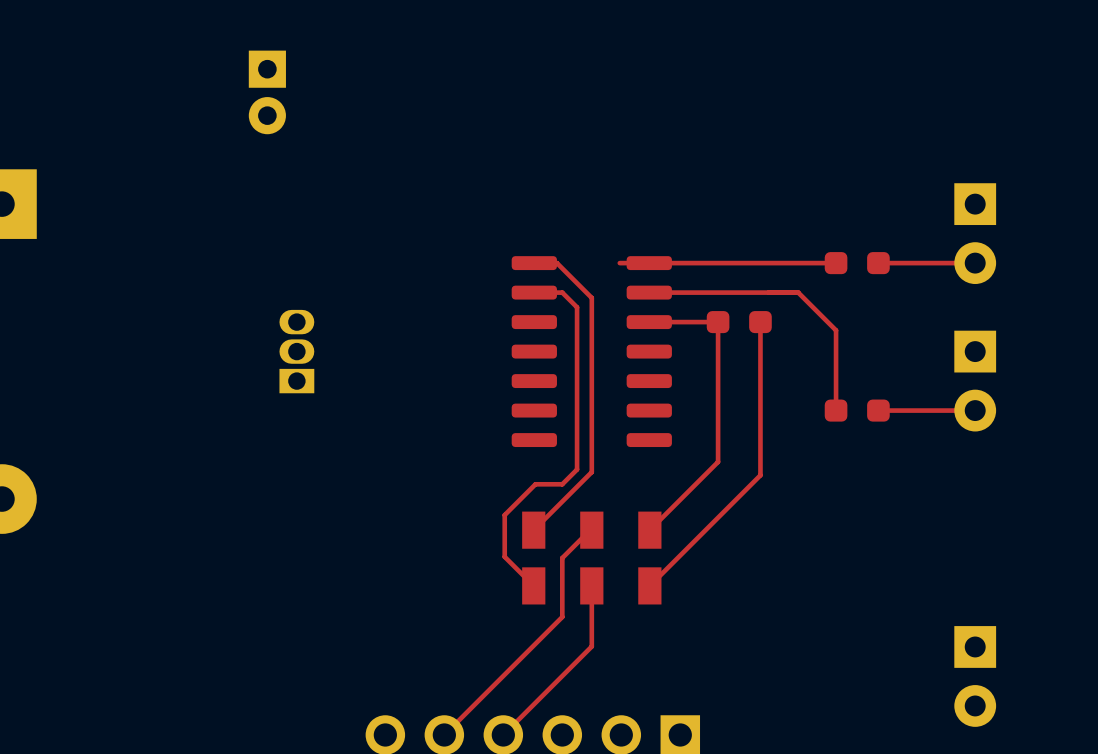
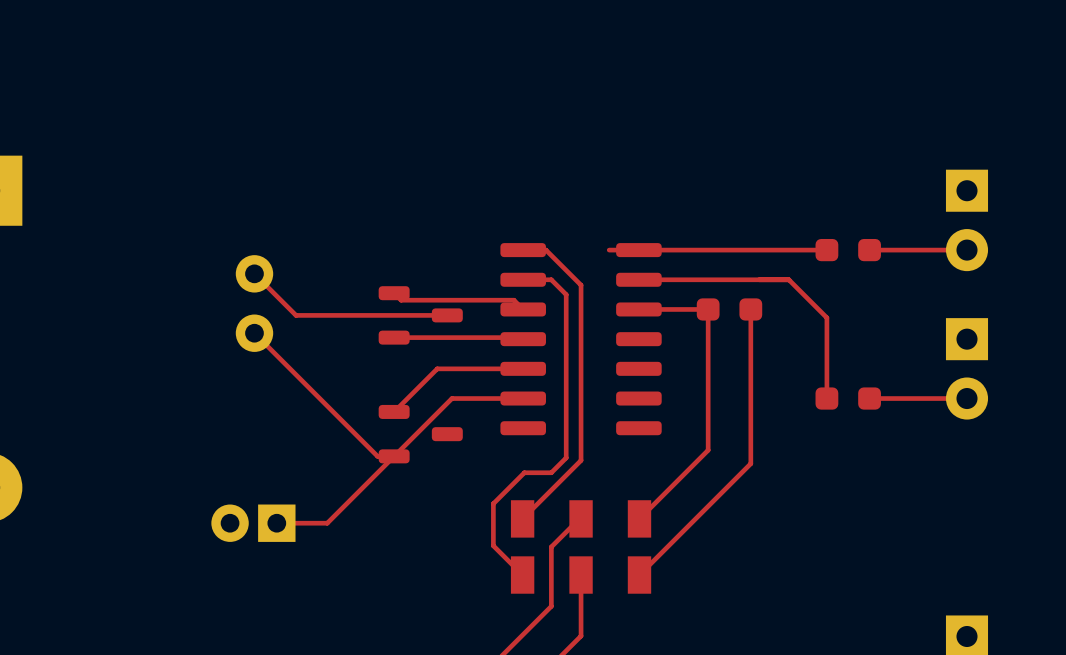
part rotation: 0° (267, 92) -> 90° clockwise (253, 523)
part position: (267, 92) -> (253, 523)
top track: none -> (254, 273) (296, 315) (447, 315)
top track: none -> (394, 293) (401, 300) (513, 300) (523, 309)
part: none -> (254, 303)
part: none -> (420, 315)
top track: none -> (254, 333) (377, 456) (394, 456)
top track: none -> (394, 337) (521, 337) (523, 339)
part: (296, 351) -> none
top track: none -> (523, 368) (437, 368) (394, 411)
top track: none -> (523, 398) (451, 398) (327, 523) (276, 523)
part: none -> (420, 434)

